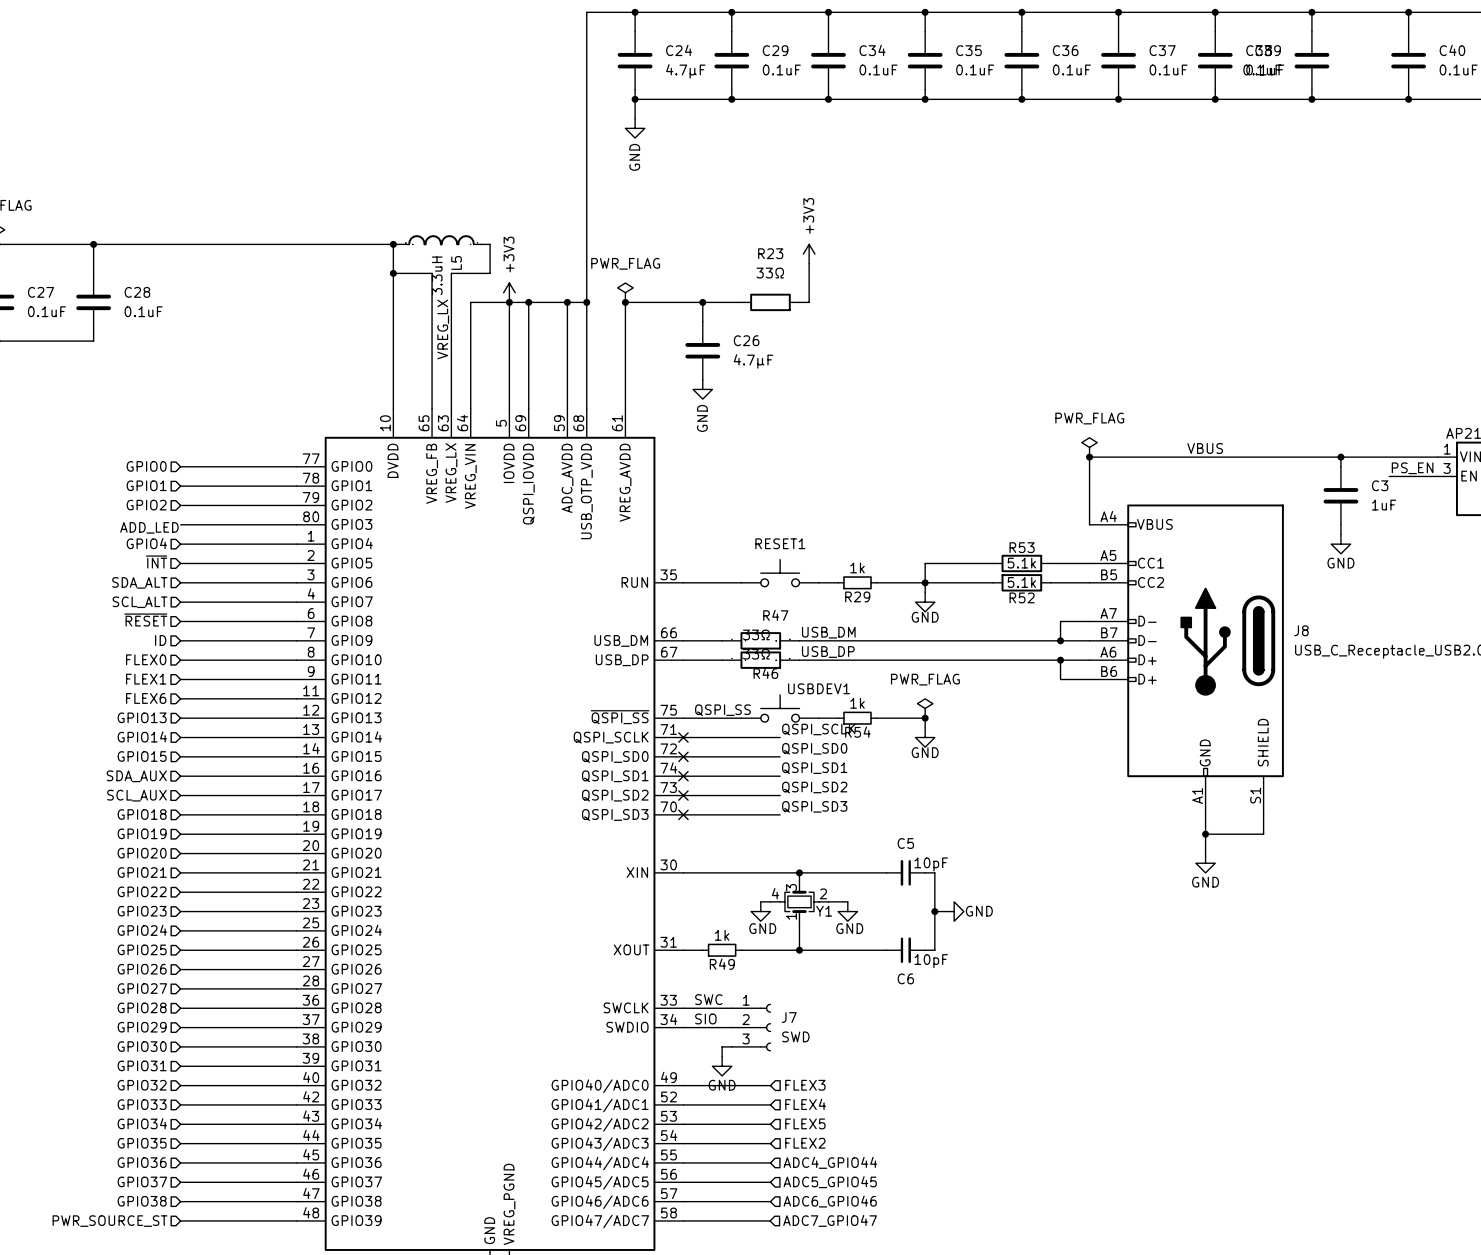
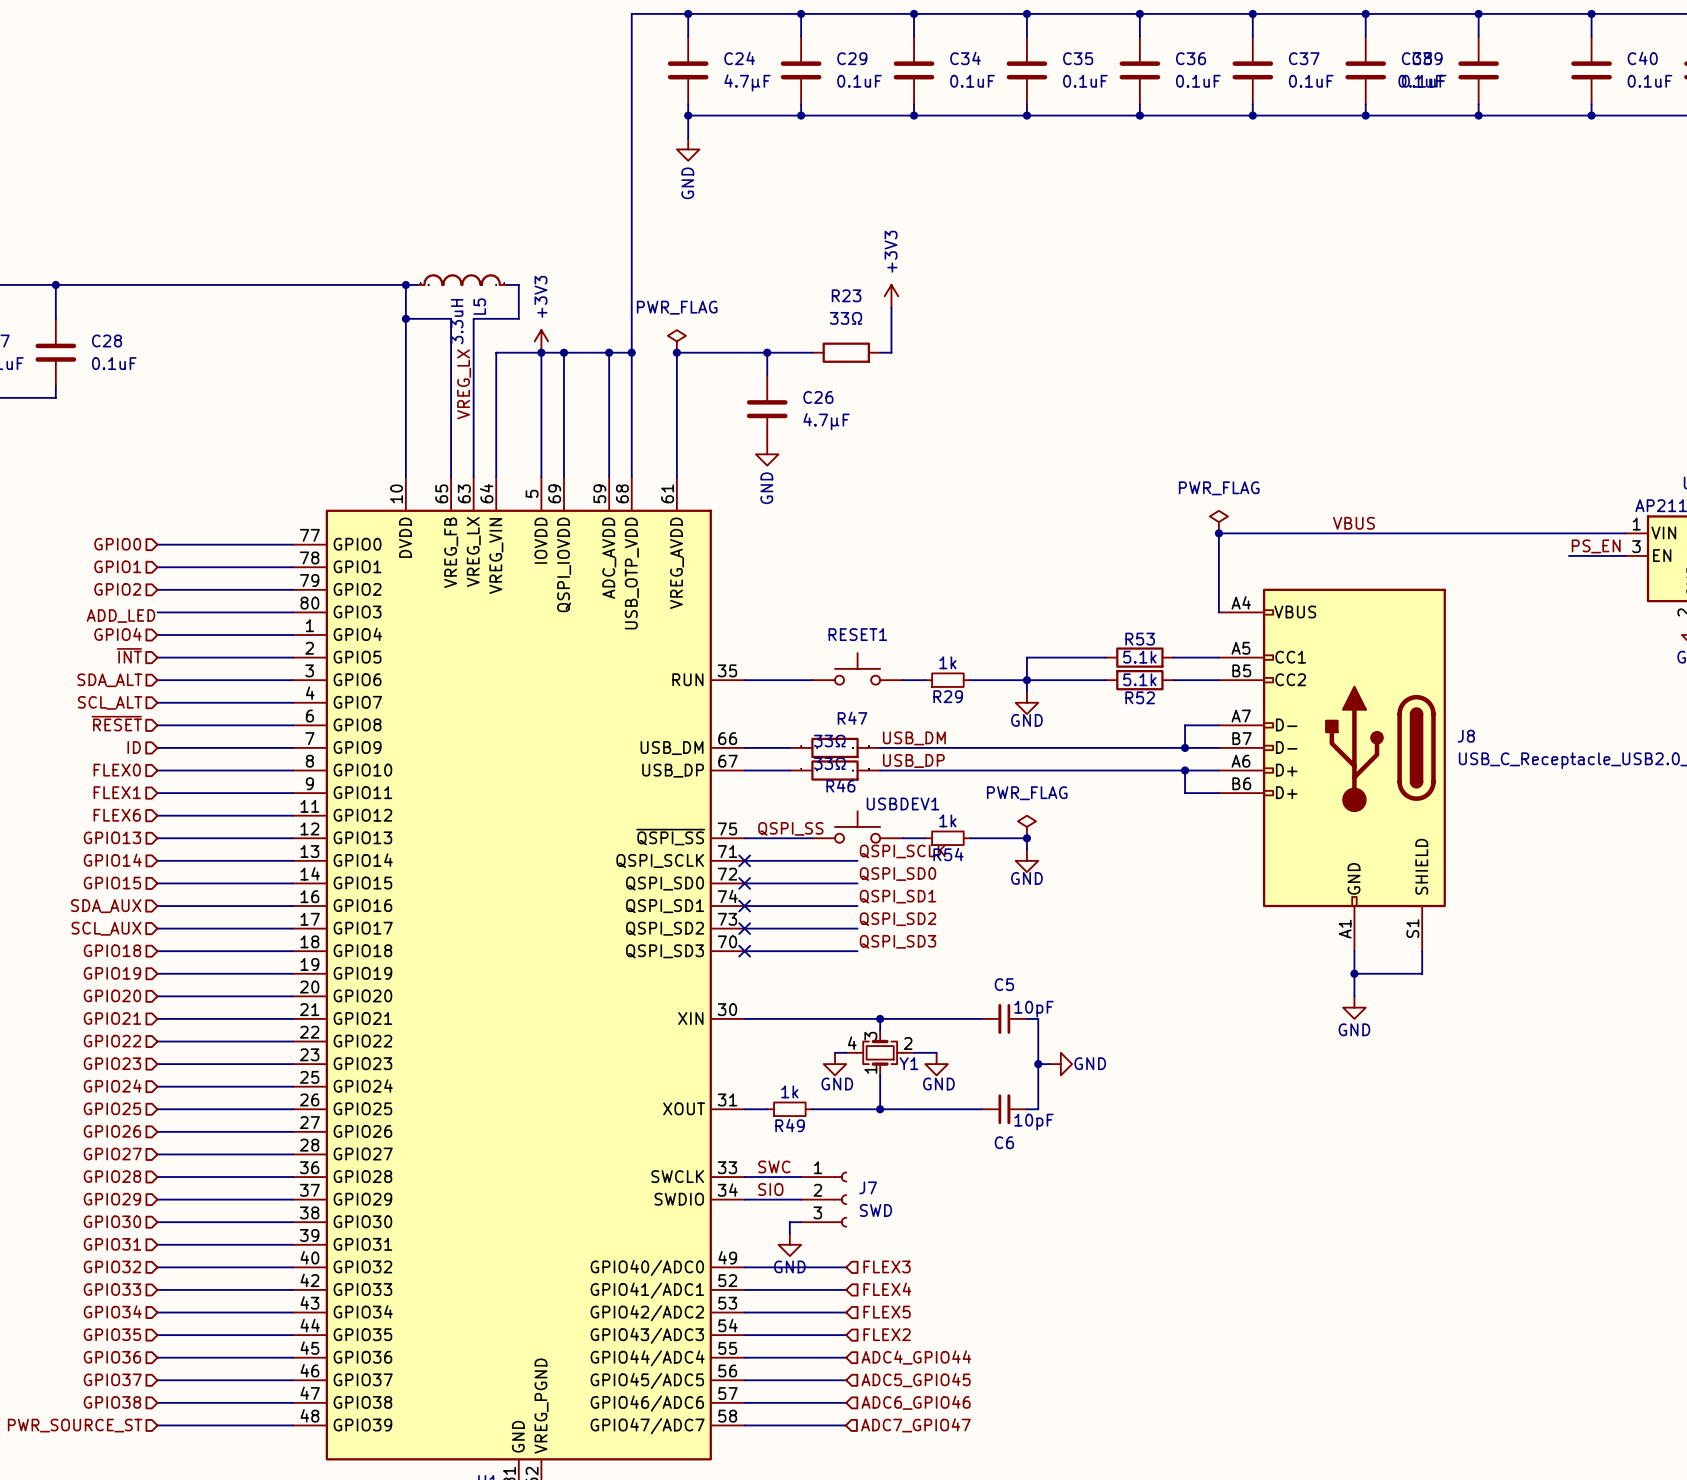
wire: (1340, 457) (1340, 466) -> none
junction: (1340, 457) -> none
C3: 1uF (1340, 495) -> none
wire: (1340, 524) (1340, 534) -> none
power symbol: GND (1340, 544) -> none

